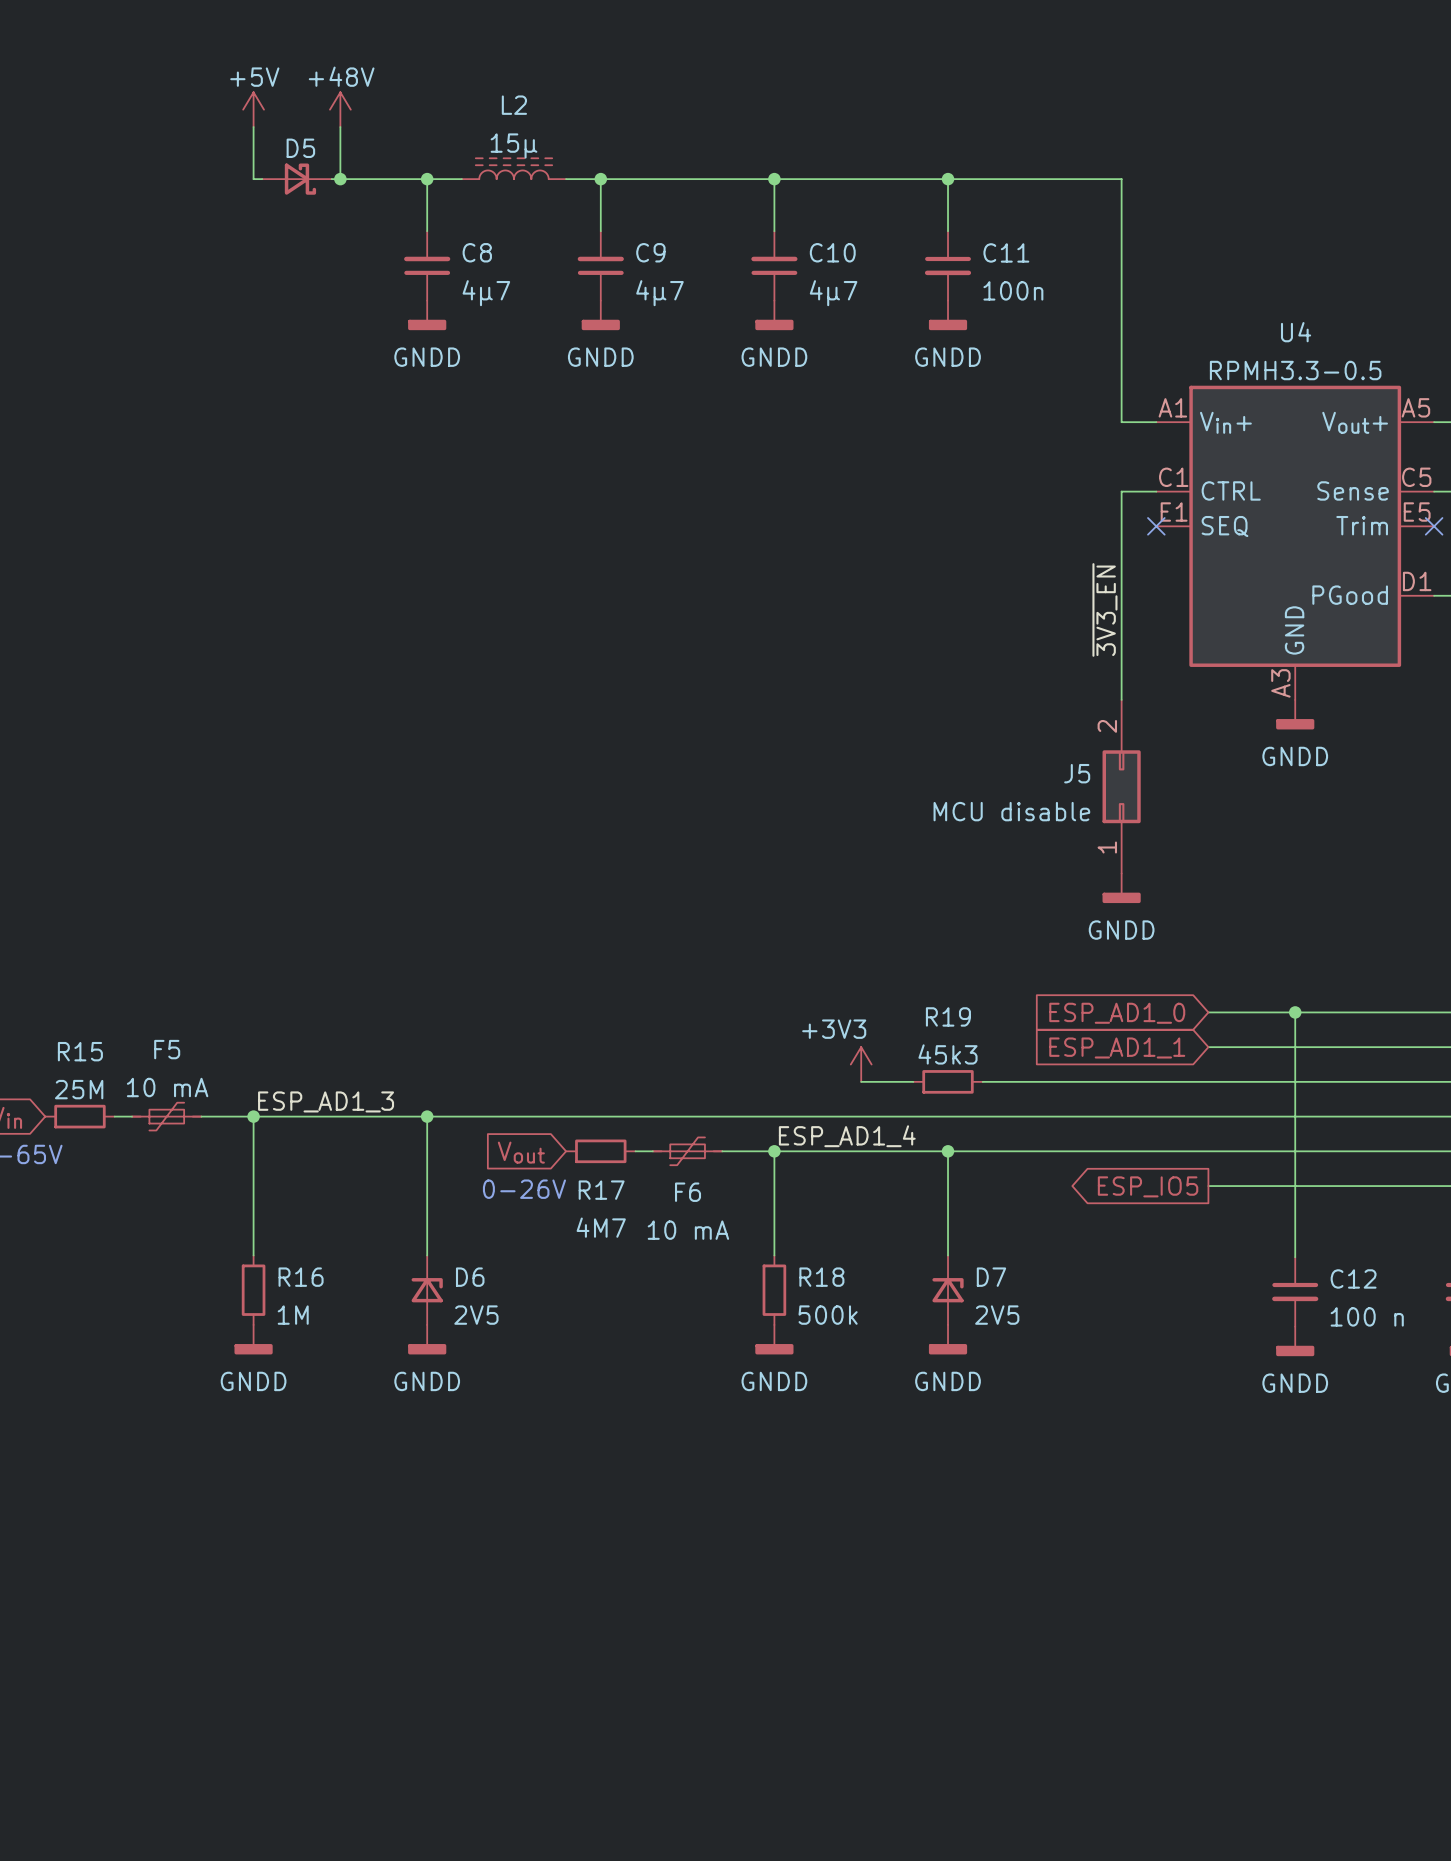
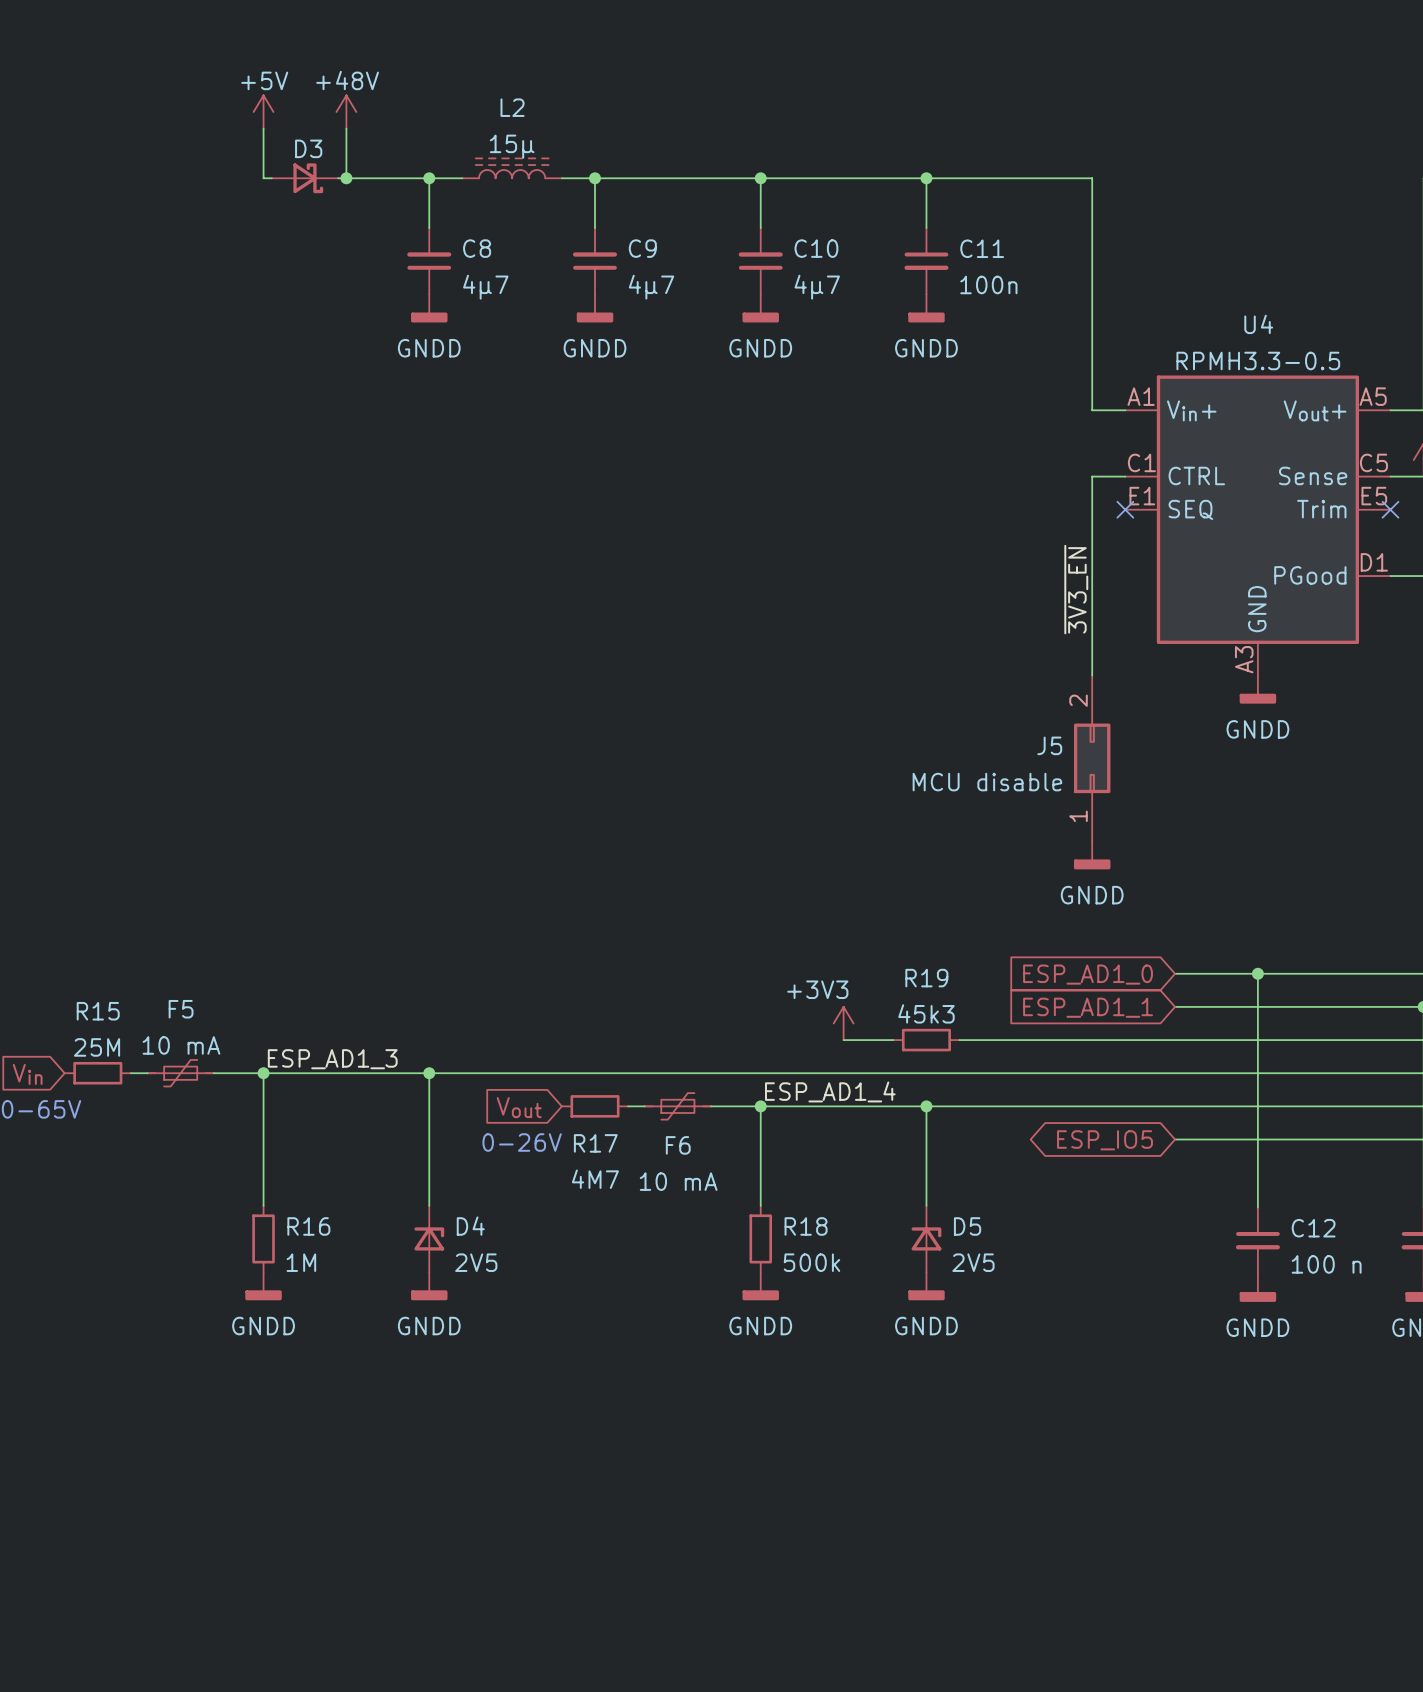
D5 name: D5 (300, 148) -> D3 (308, 148)
global label shape: output (1148, 1186) -> bidirectional (1104, 1140)
D6 name: D6 (470, 1277) -> D4 (470, 1226)
D7 name: D7 (991, 1277) -> D5 (967, 1226)

